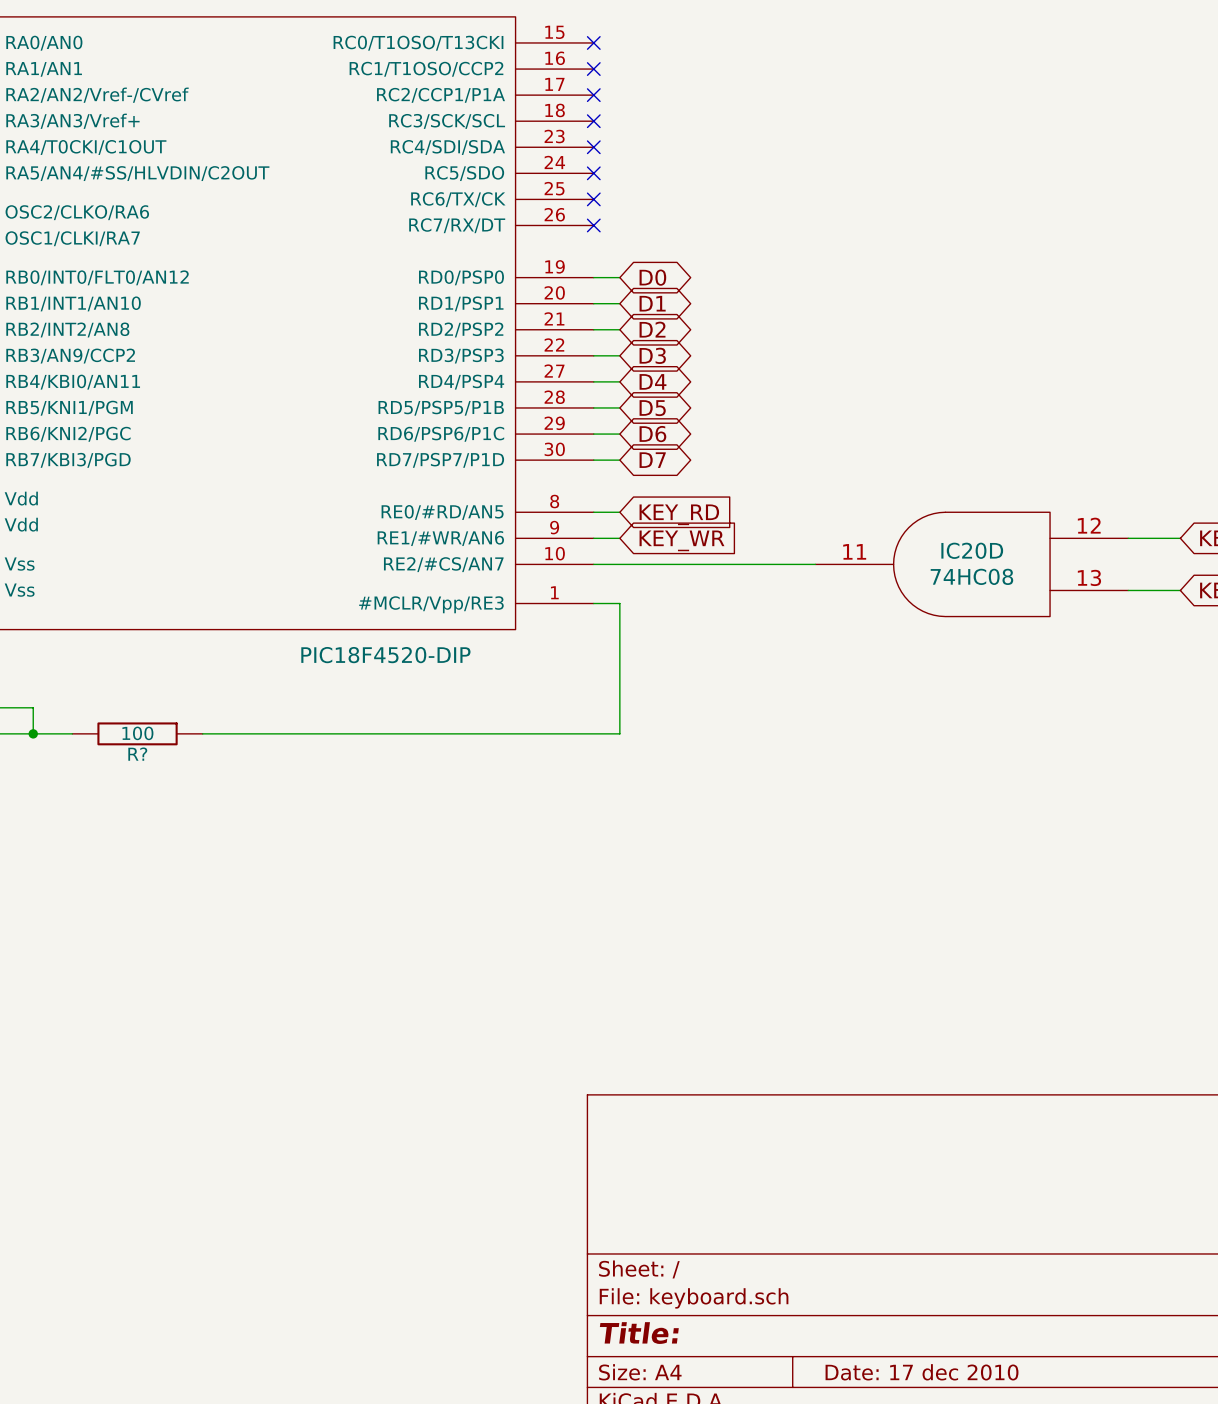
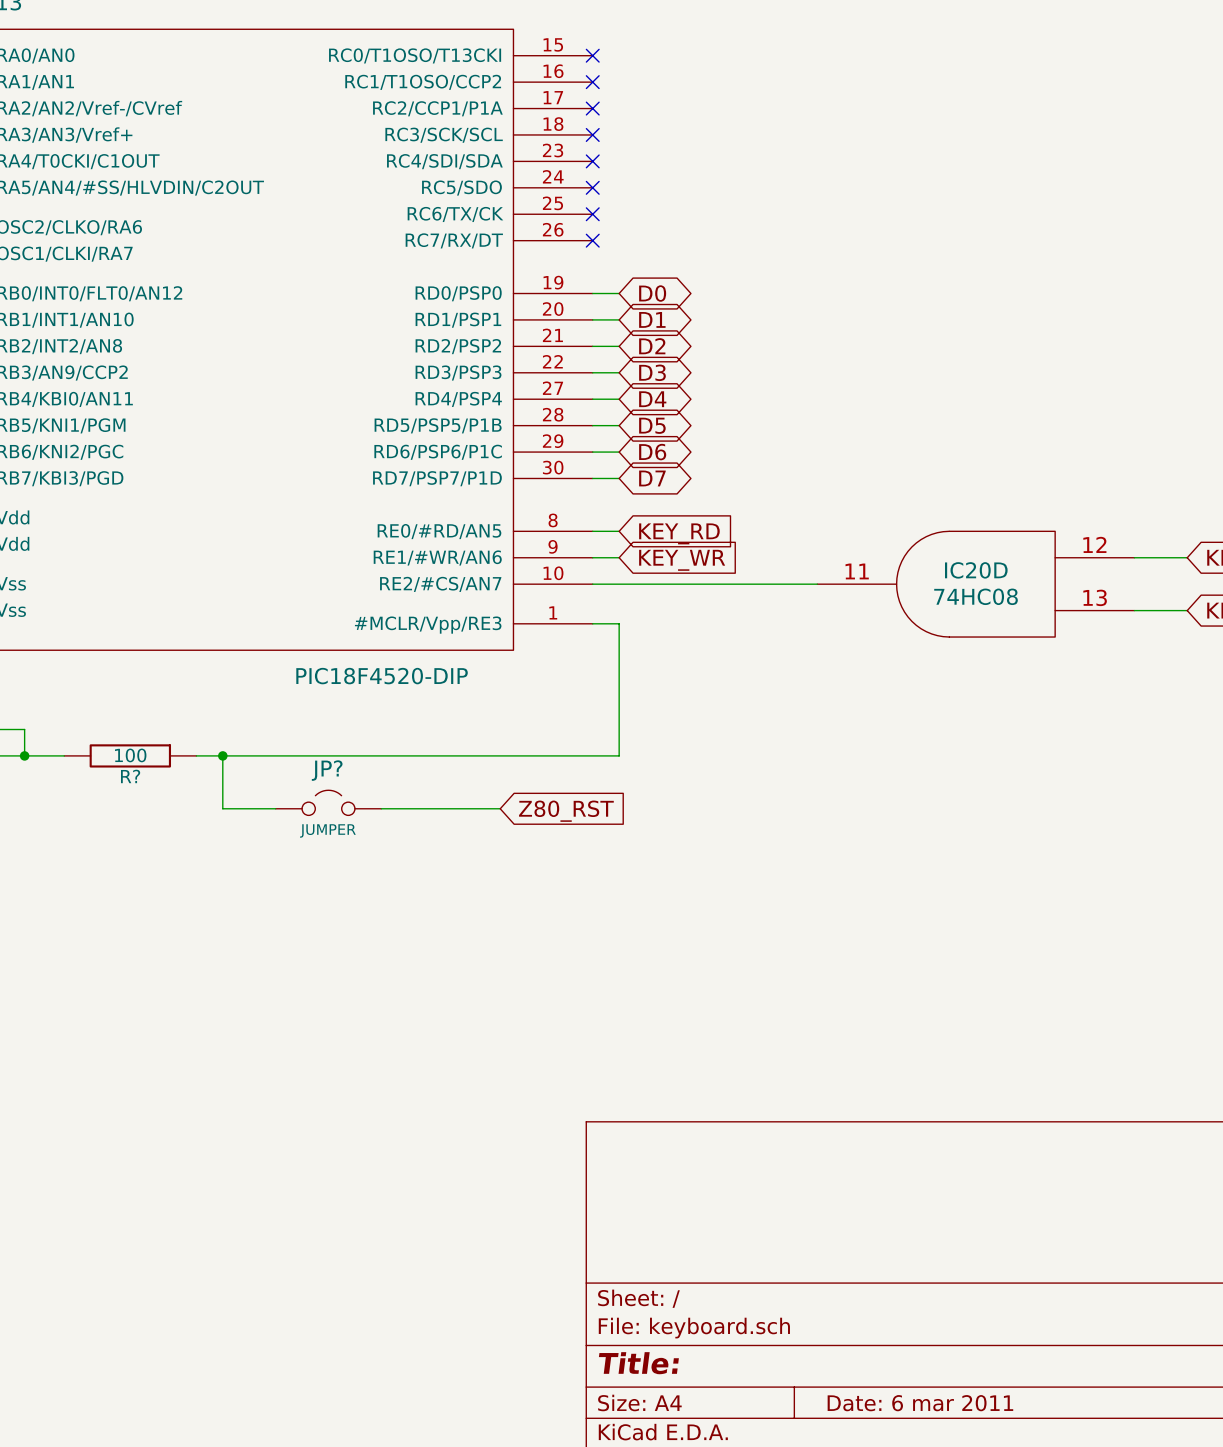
wire: none -> (222, 755) (222, 808) (275, 808)
junction: none -> (222, 755)
JP?: none -> JUMPER (328, 802)
wire: none -> (381, 808) (500, 808)
global label: none -> Z80_RST (566, 811)
title block: Date: 17 dec 2010 (922, 1372) -> Date: 6 mar 2011 (920, 1403)

